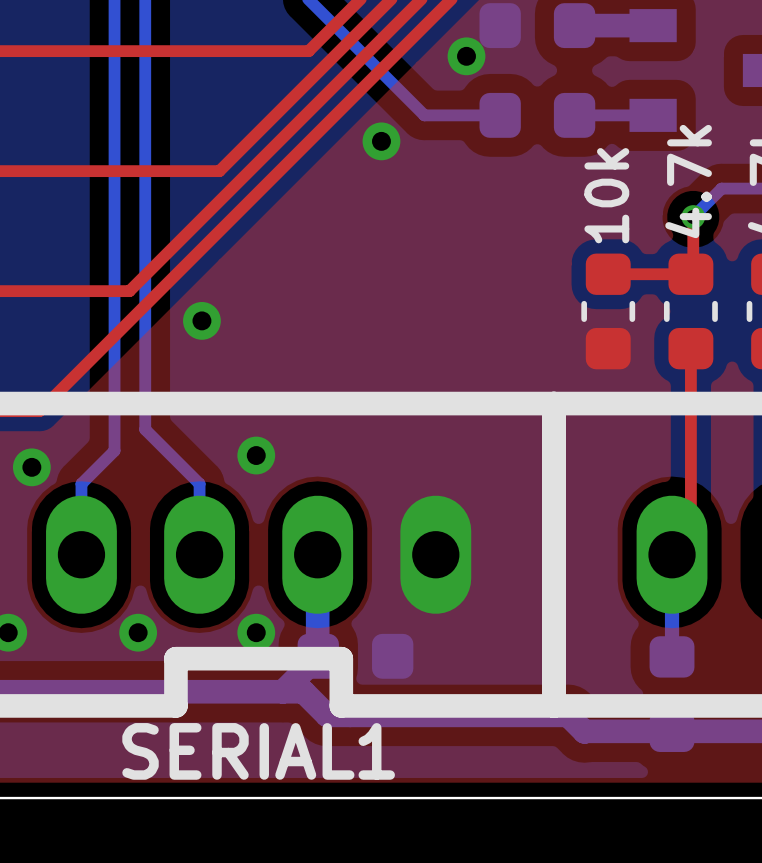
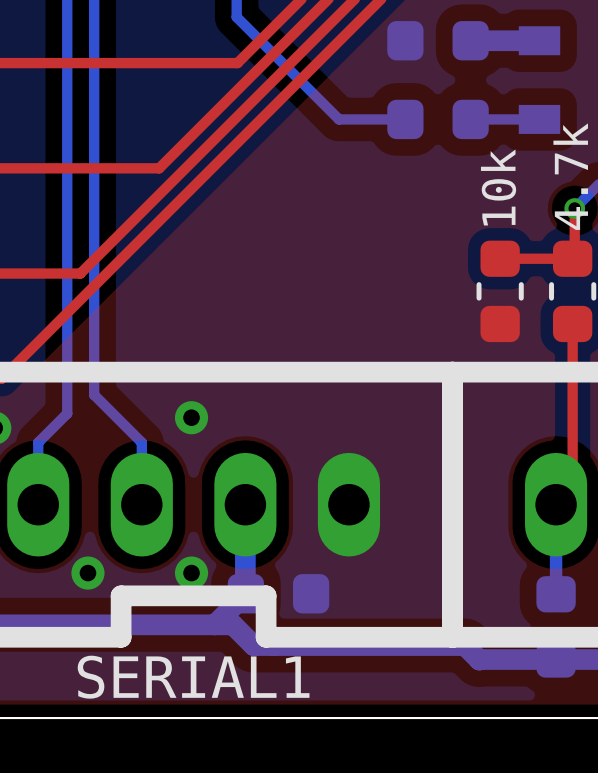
via: (466, 56) -> none
via: (381, 141) -> none
via: (201, 320) -> none

